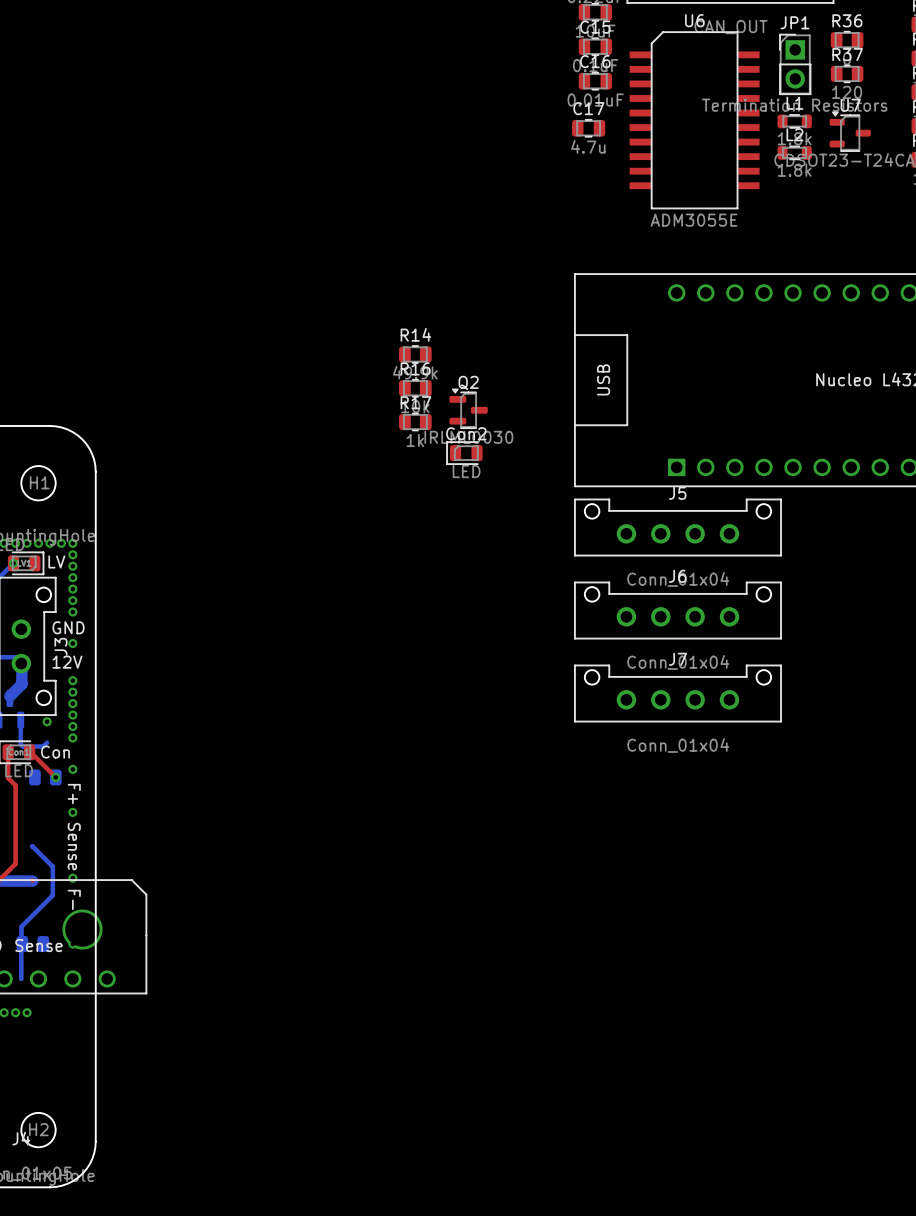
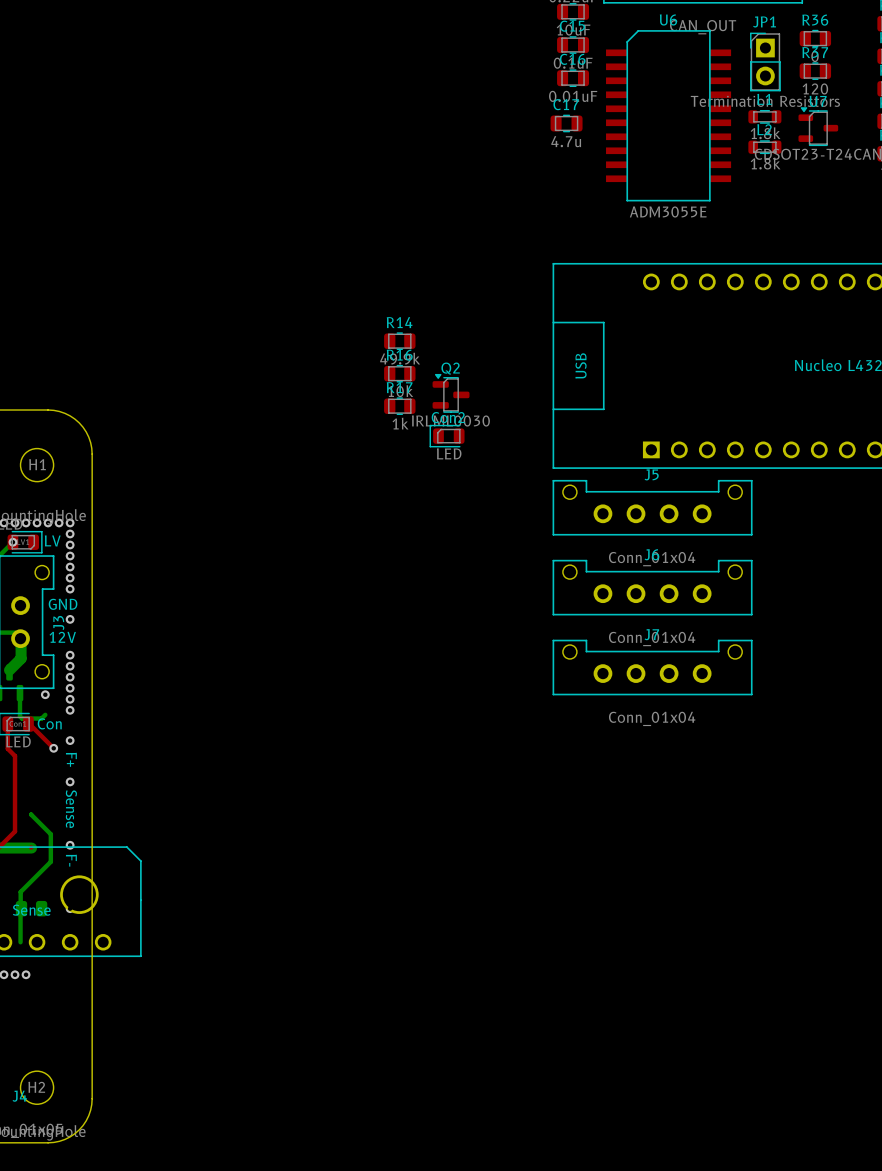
part: (45, 777) -> none

